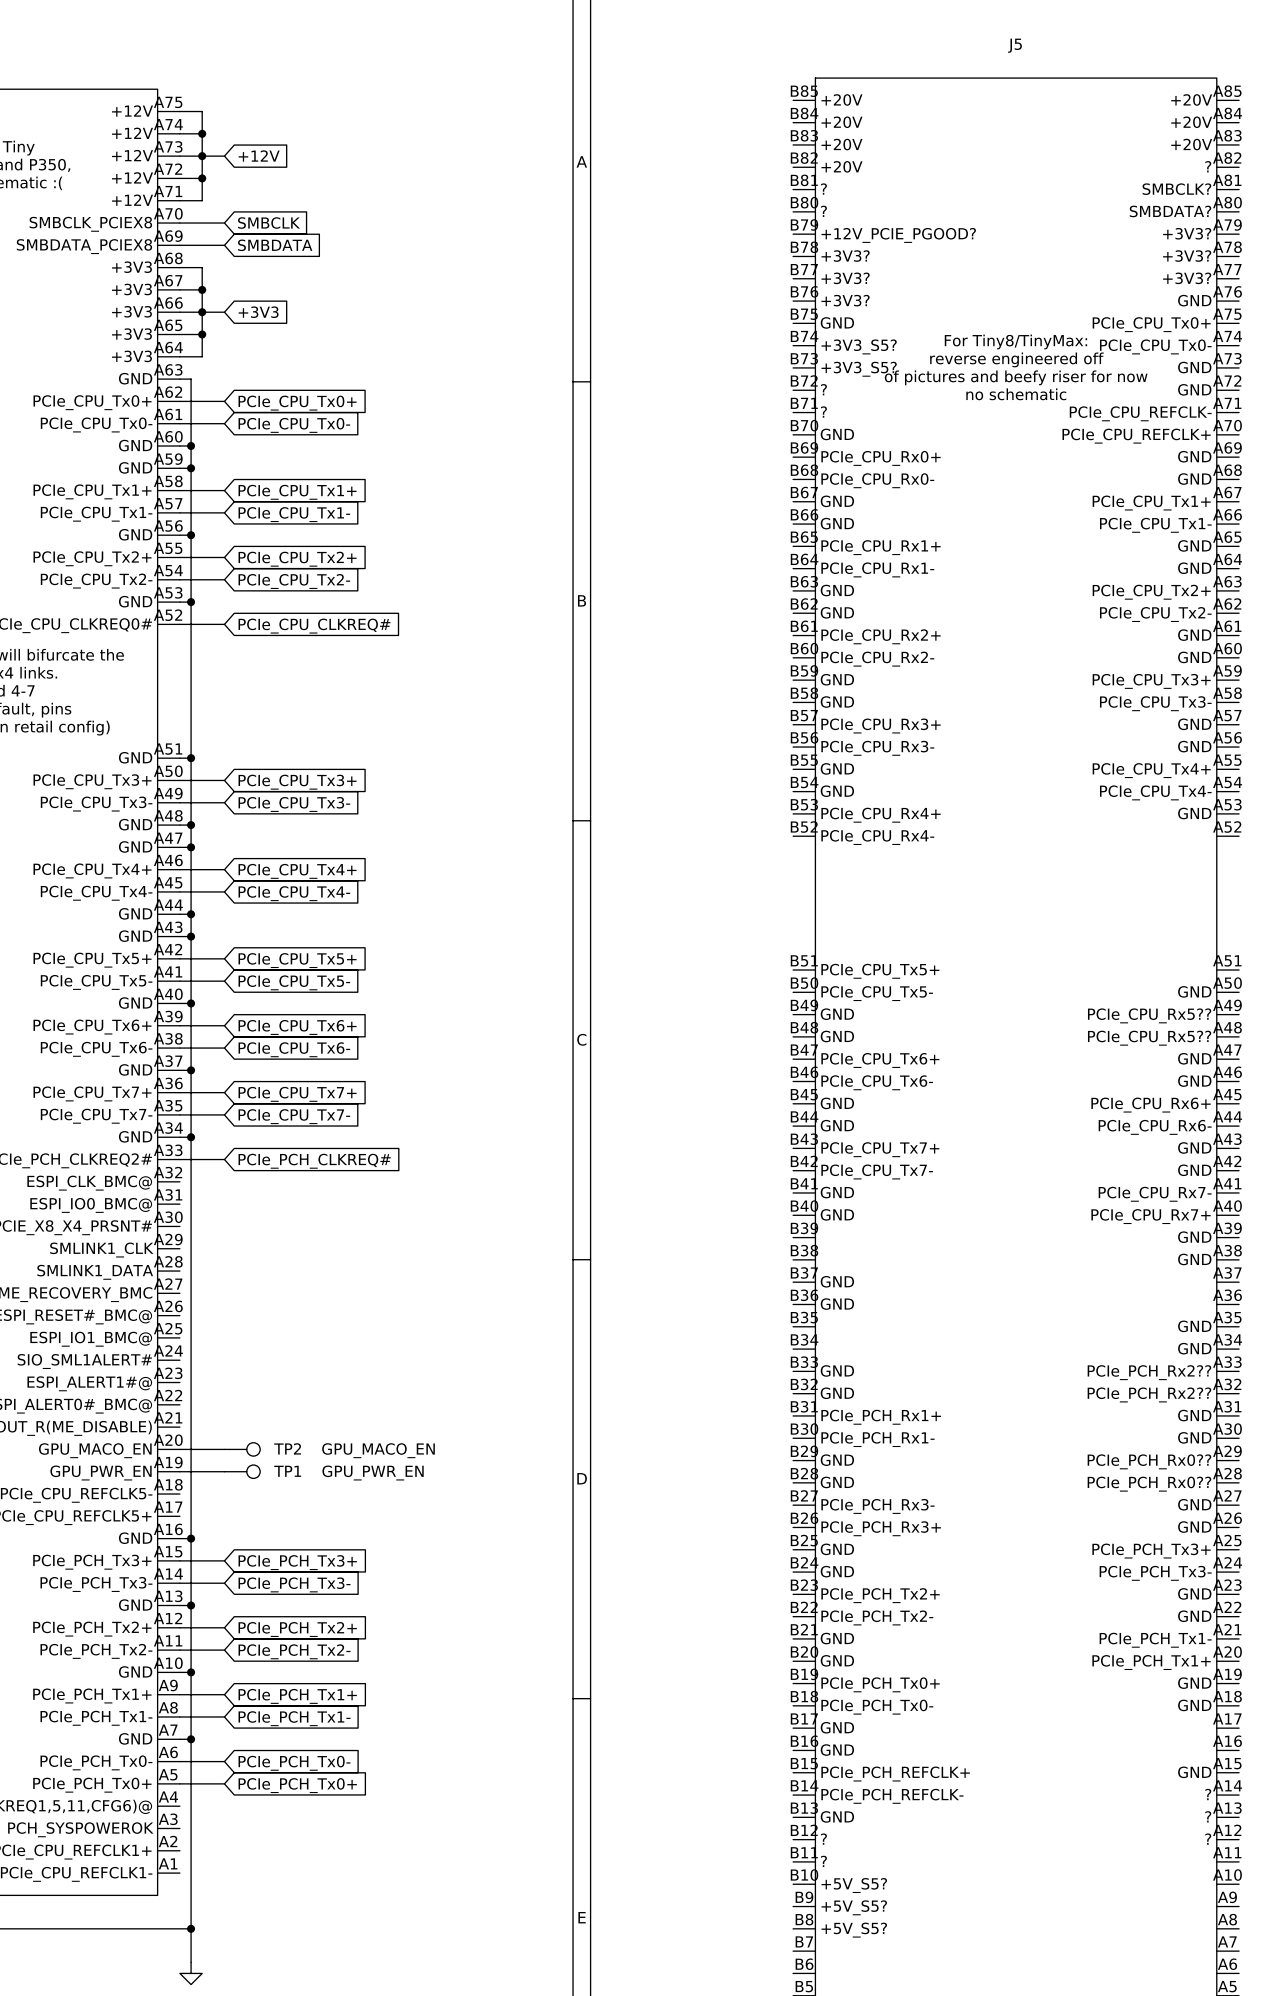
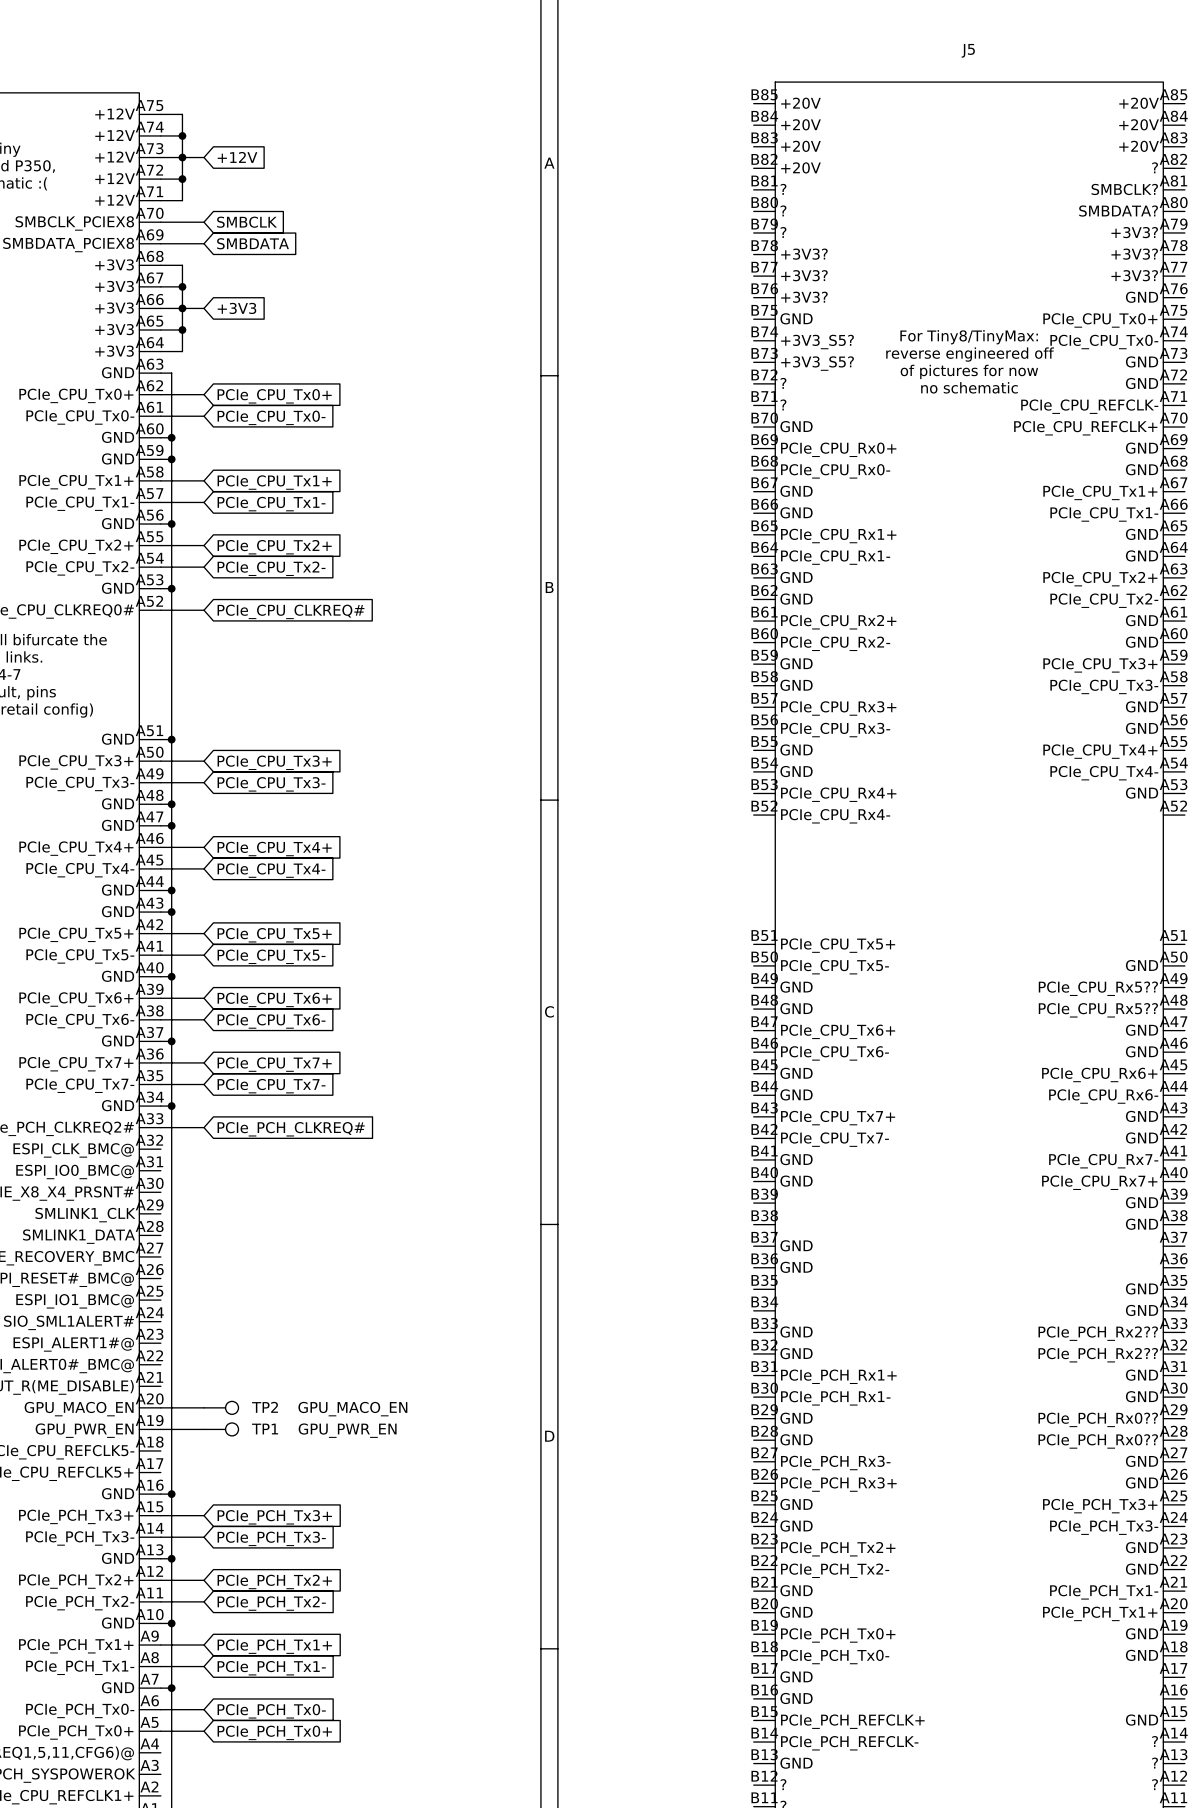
J5 pin name: +12V_PCIE_PGOOD? (898, 235) -> ? (783, 232)
J5 text: of pictures and beefy riser for now (1016, 377) -> of pictures for now (969, 371)

